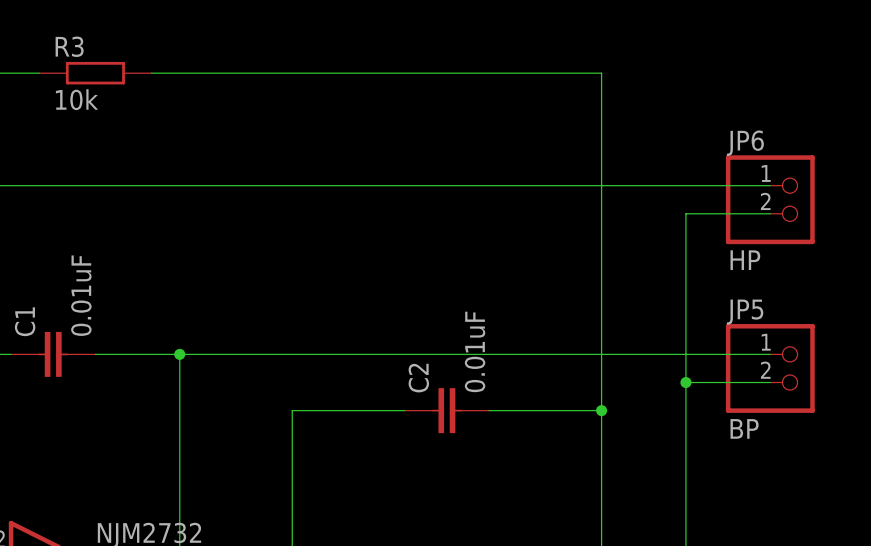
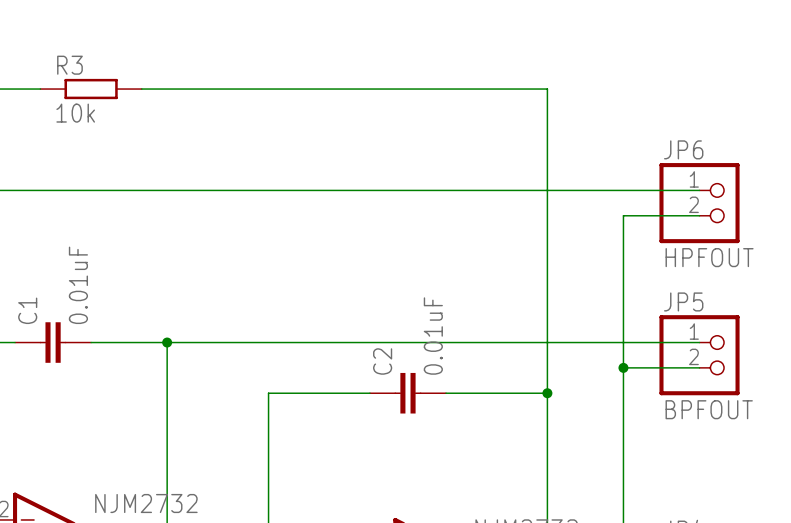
JP6 value: HP (745, 260) -> HPFOUT (709, 257)
JP5 value: BP (744, 428) -> BPFOUT (709, 409)

